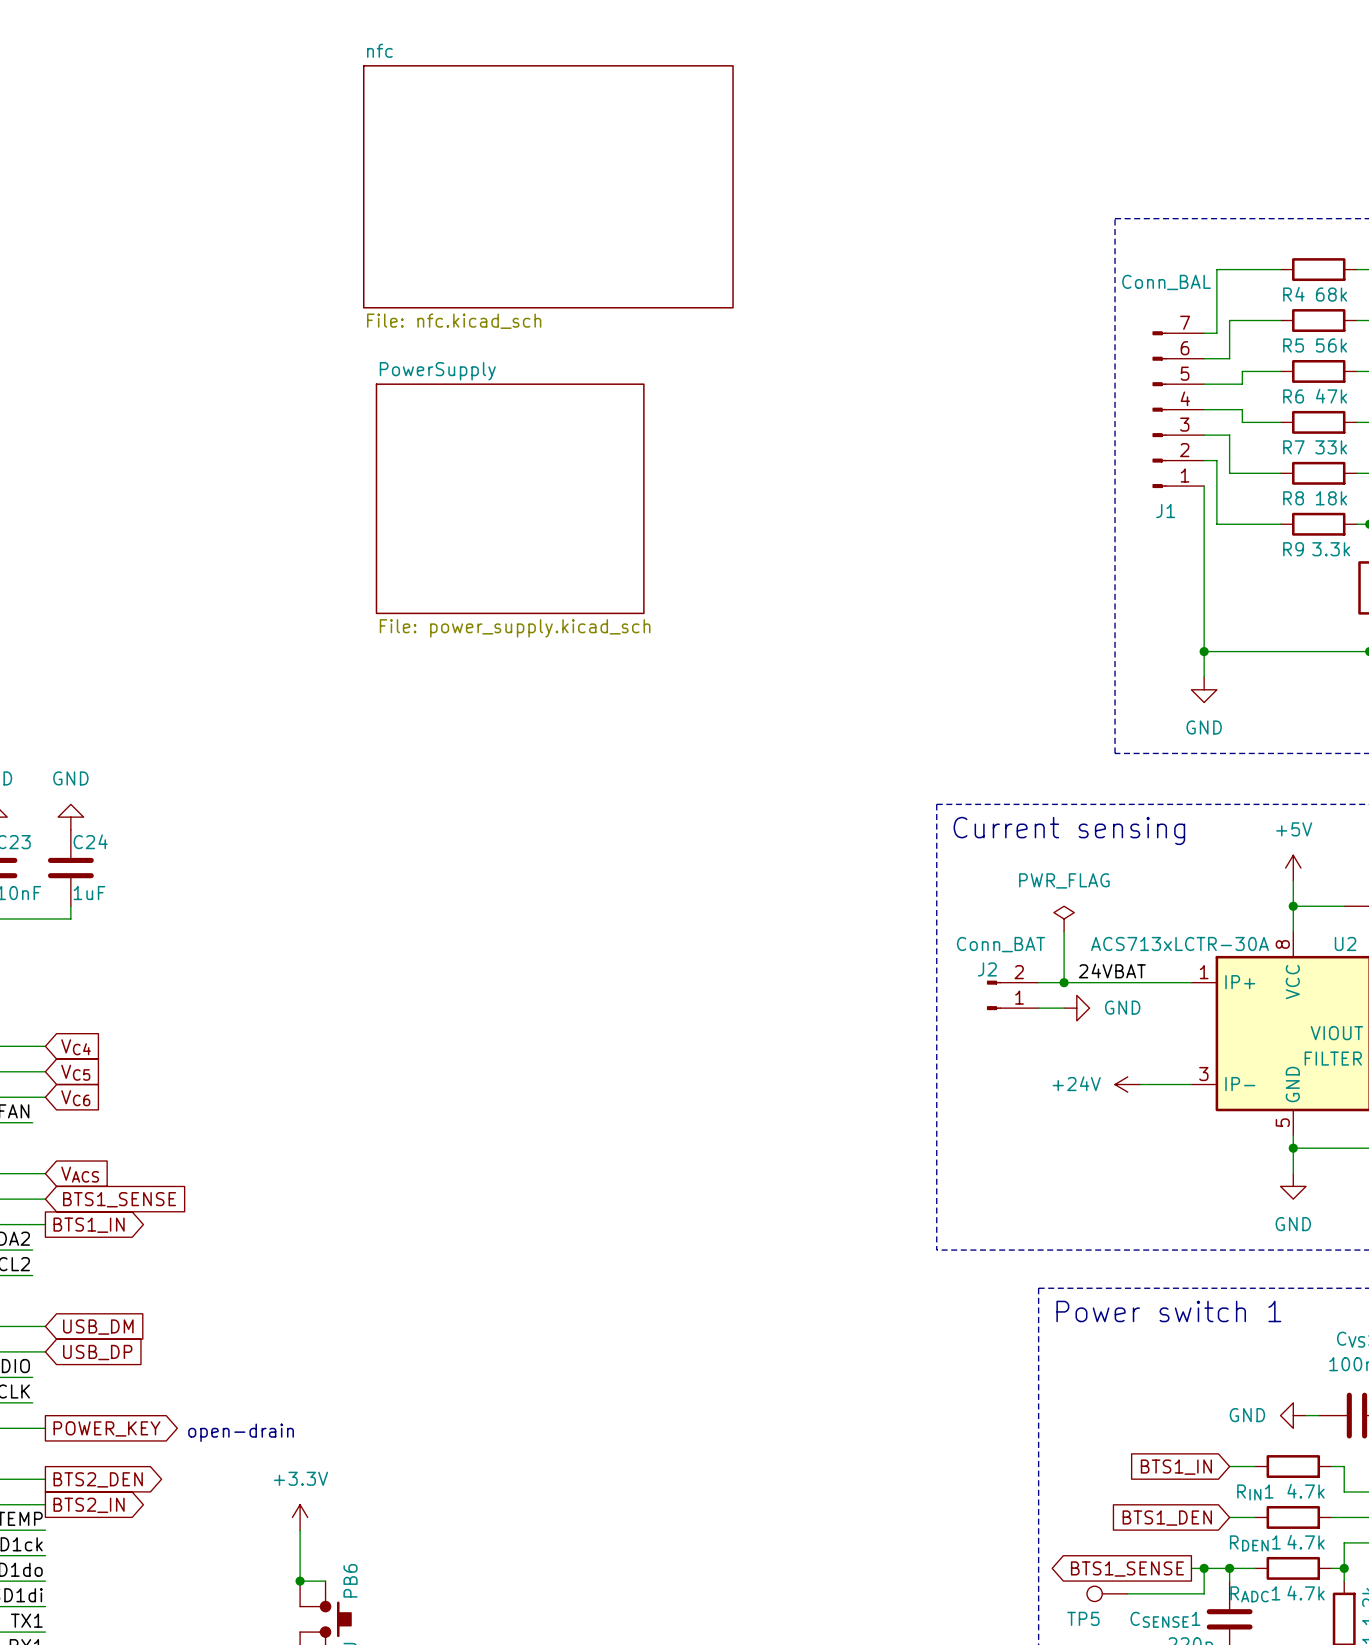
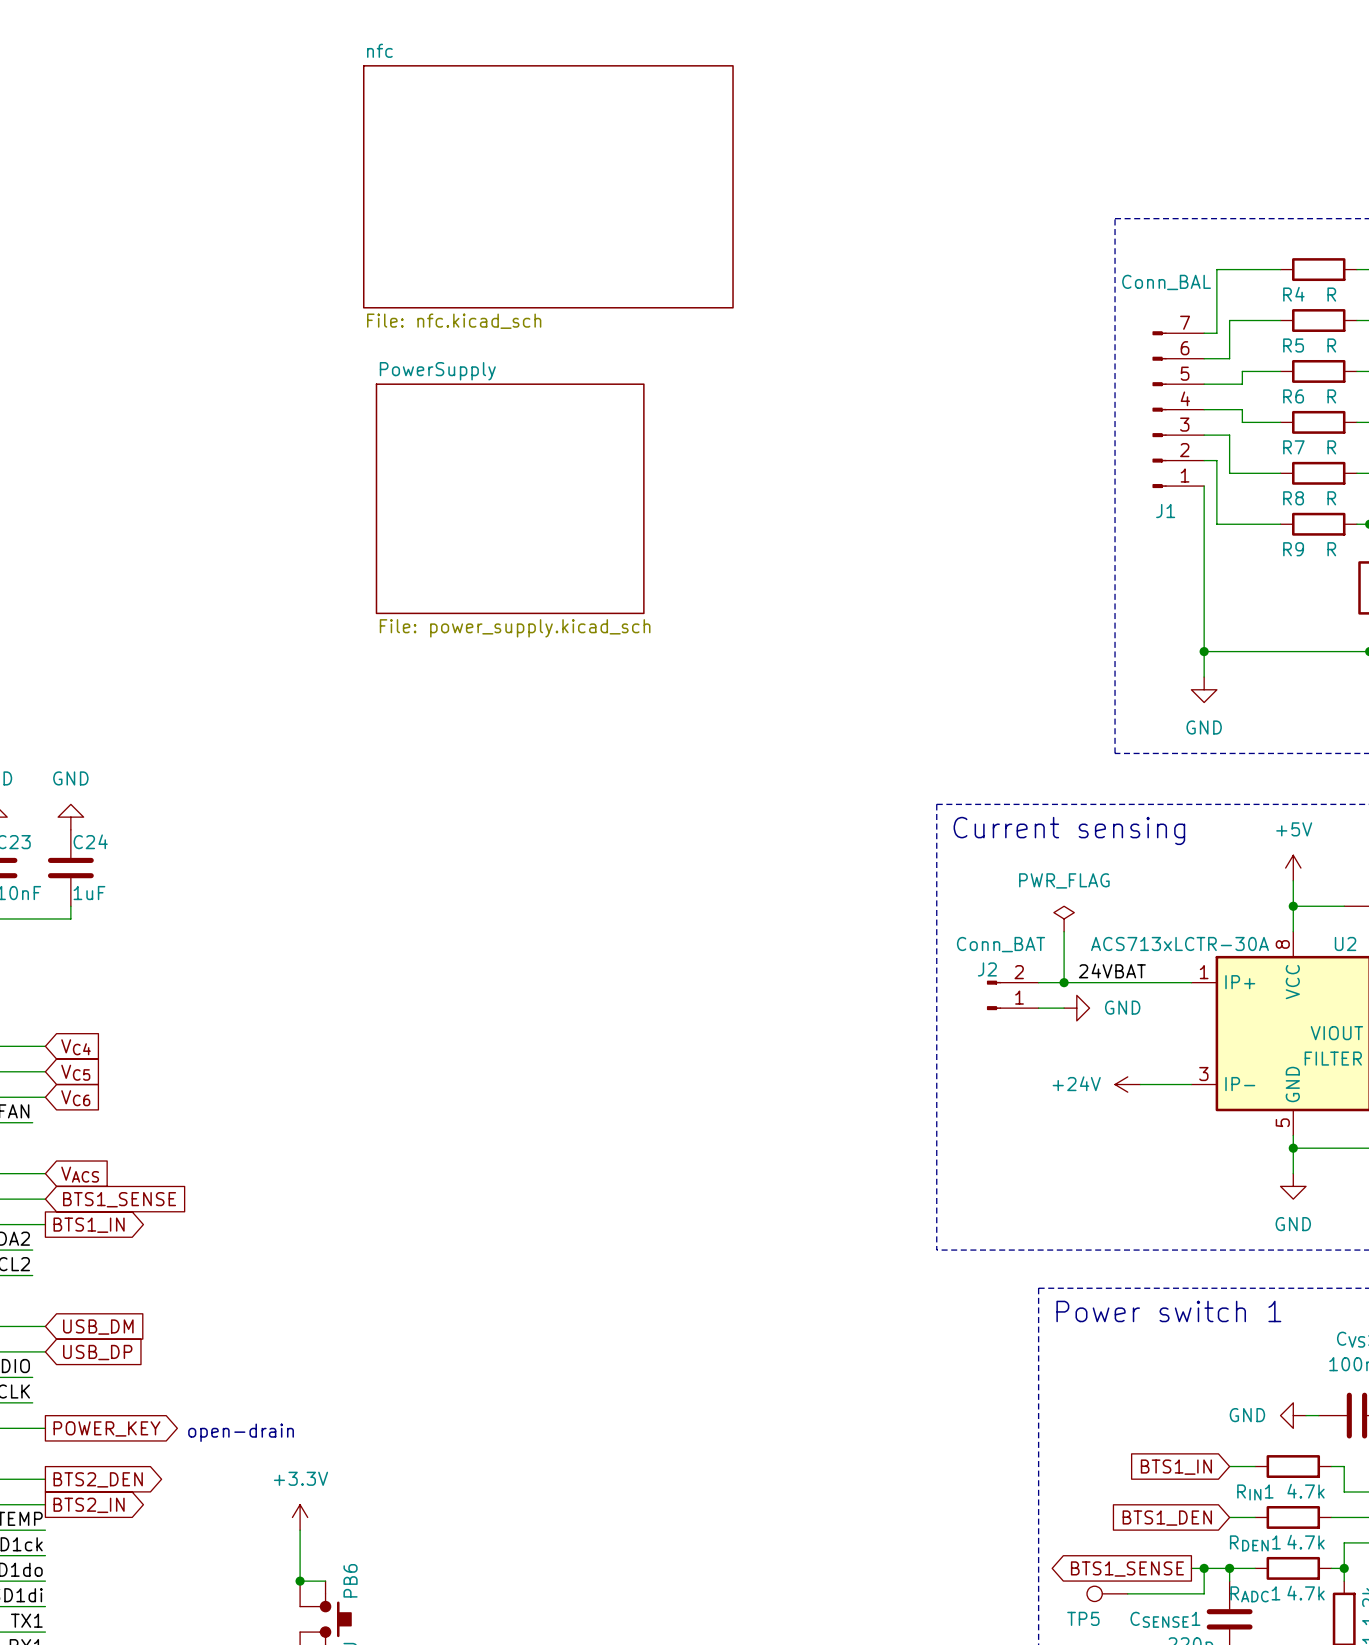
R4 value: 68k (1331, 294) -> R (1331, 294)
R5 value: 56k (1331, 345) -> R (1331, 345)
R6 value: 47k (1331, 396) -> R (1331, 396)
R7 value: 33k (1331, 447) -> R (1331, 447)
R8 value: 18k (1331, 498) -> R (1331, 498)
R9 value: 3.3k (1331, 549) -> R (1331, 549)

